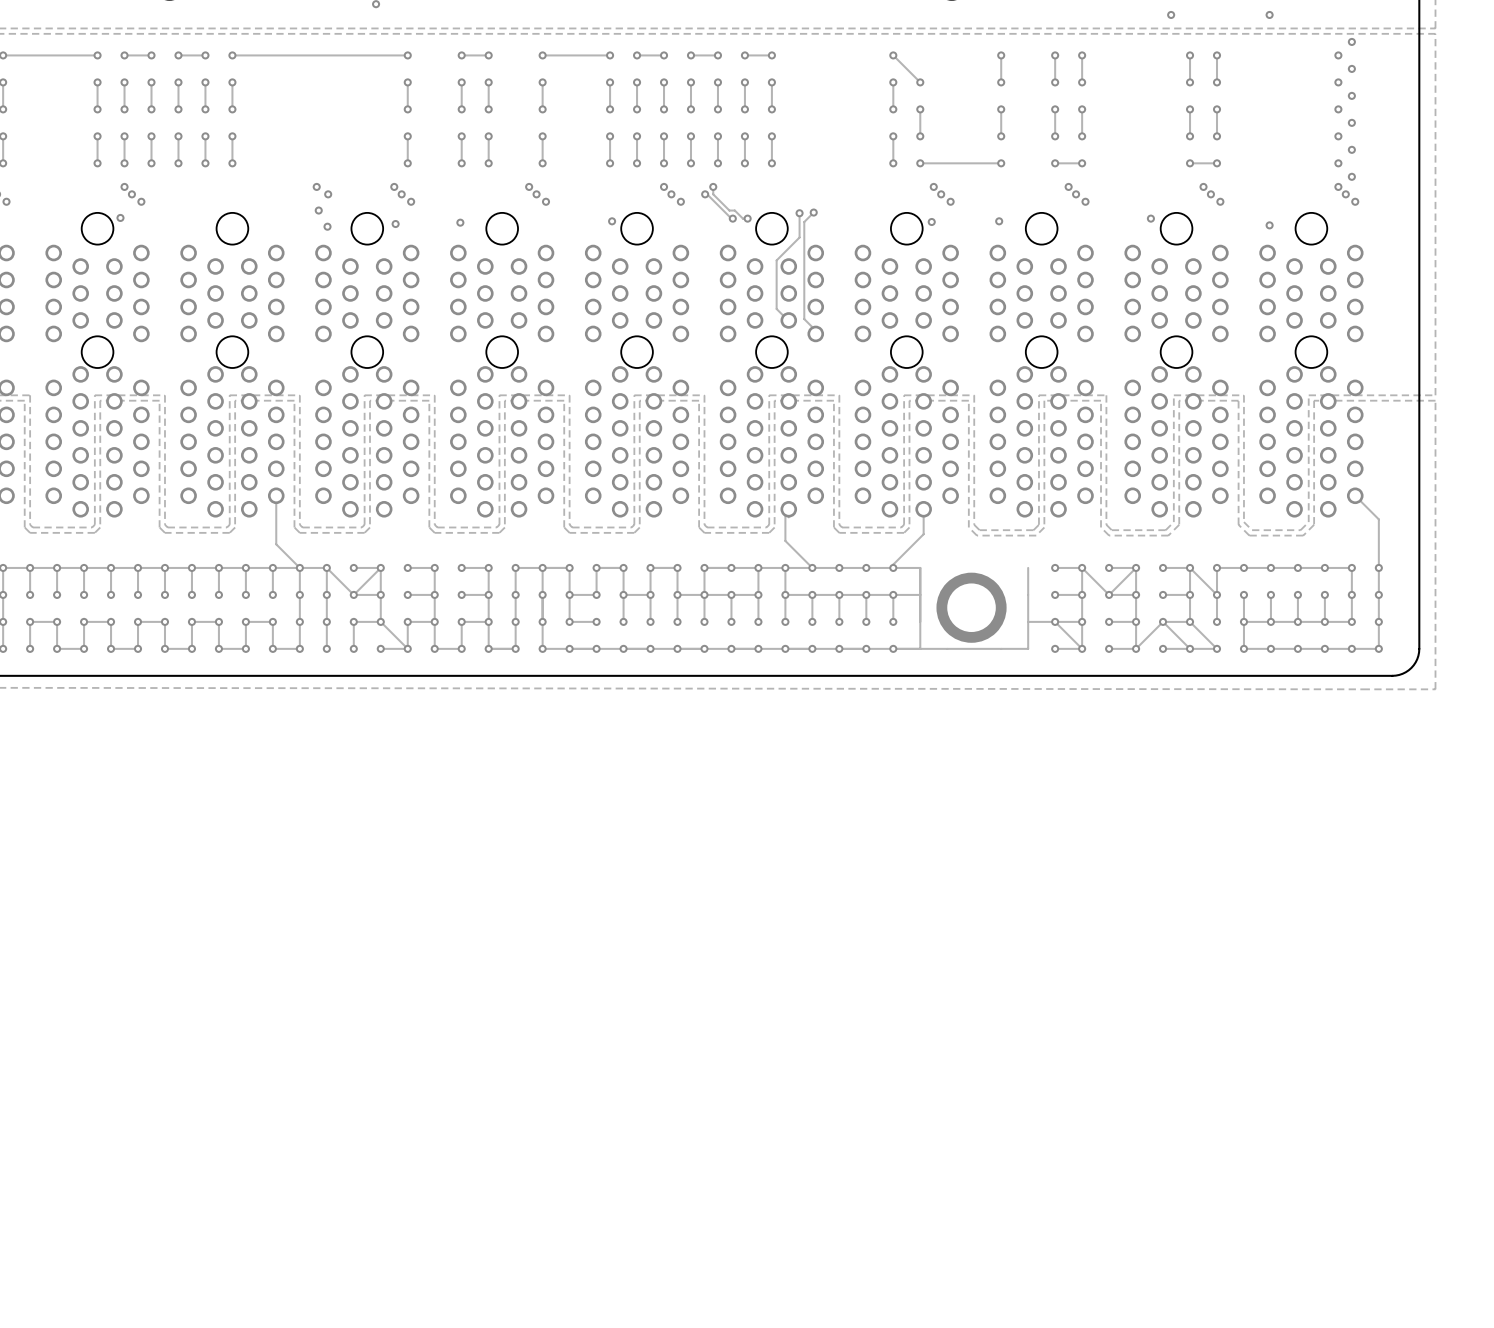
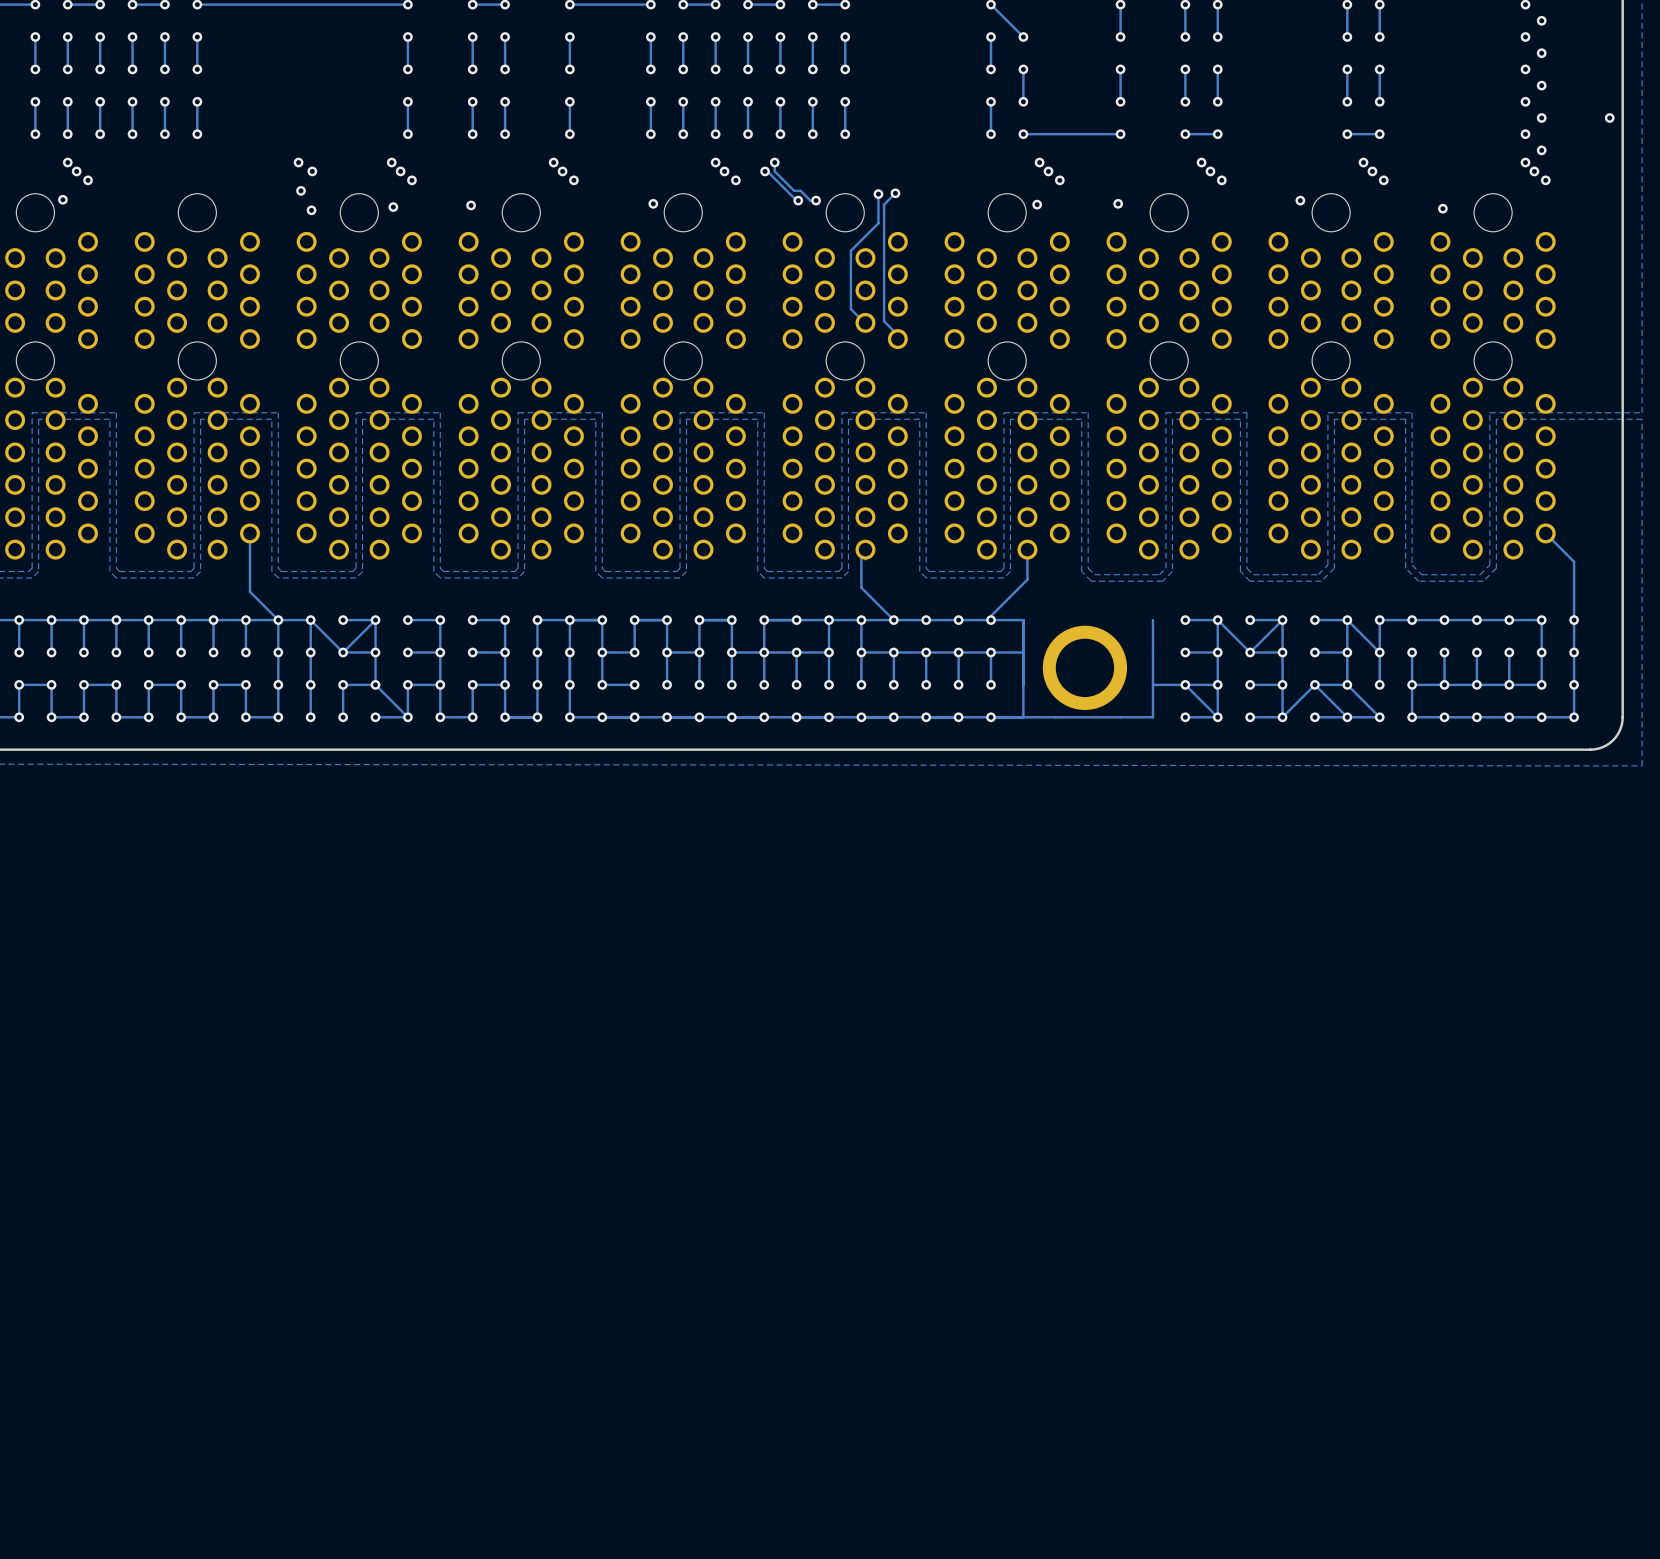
via: none -> (1609, 117)

